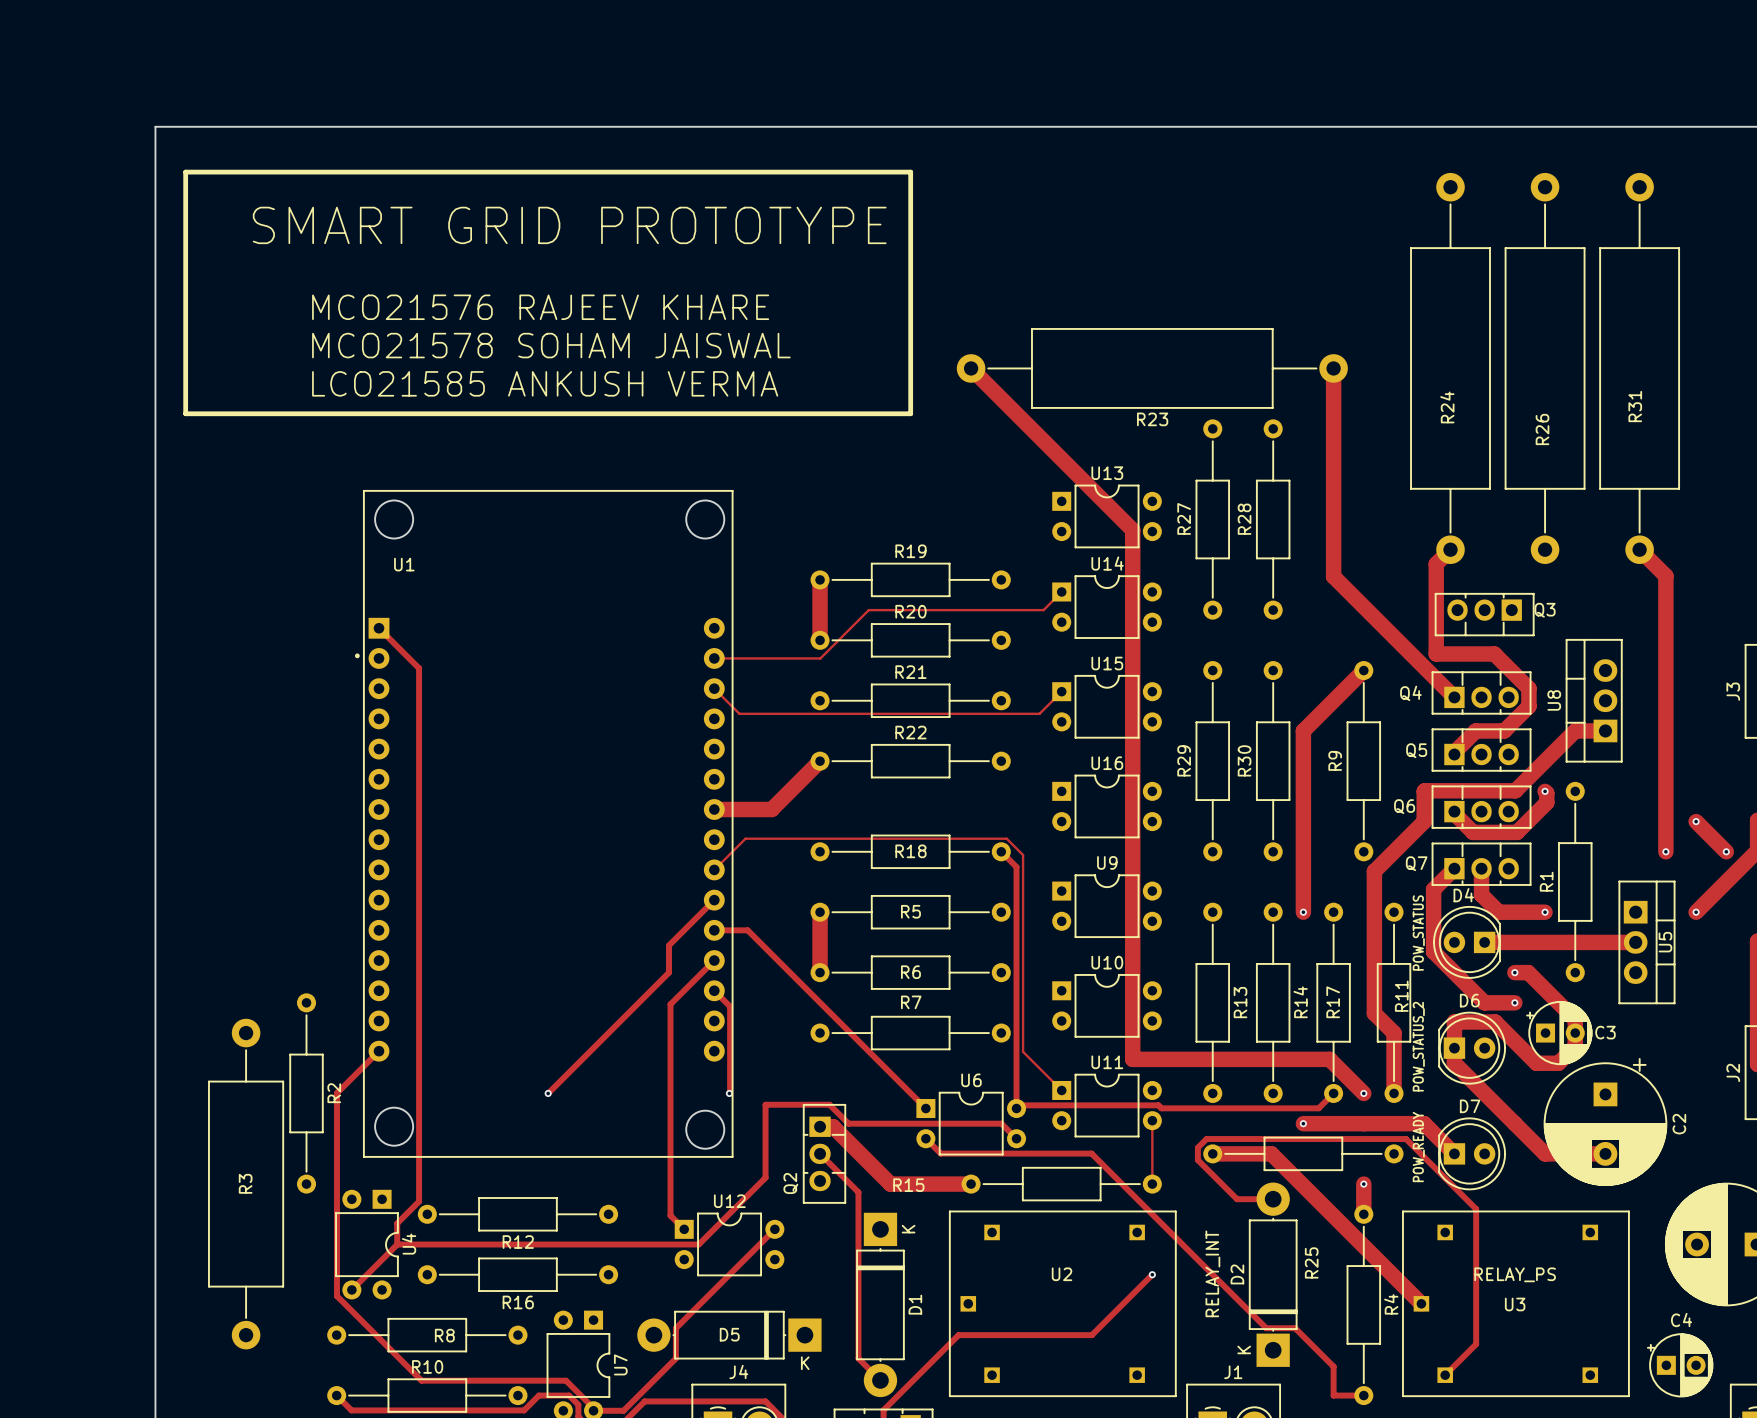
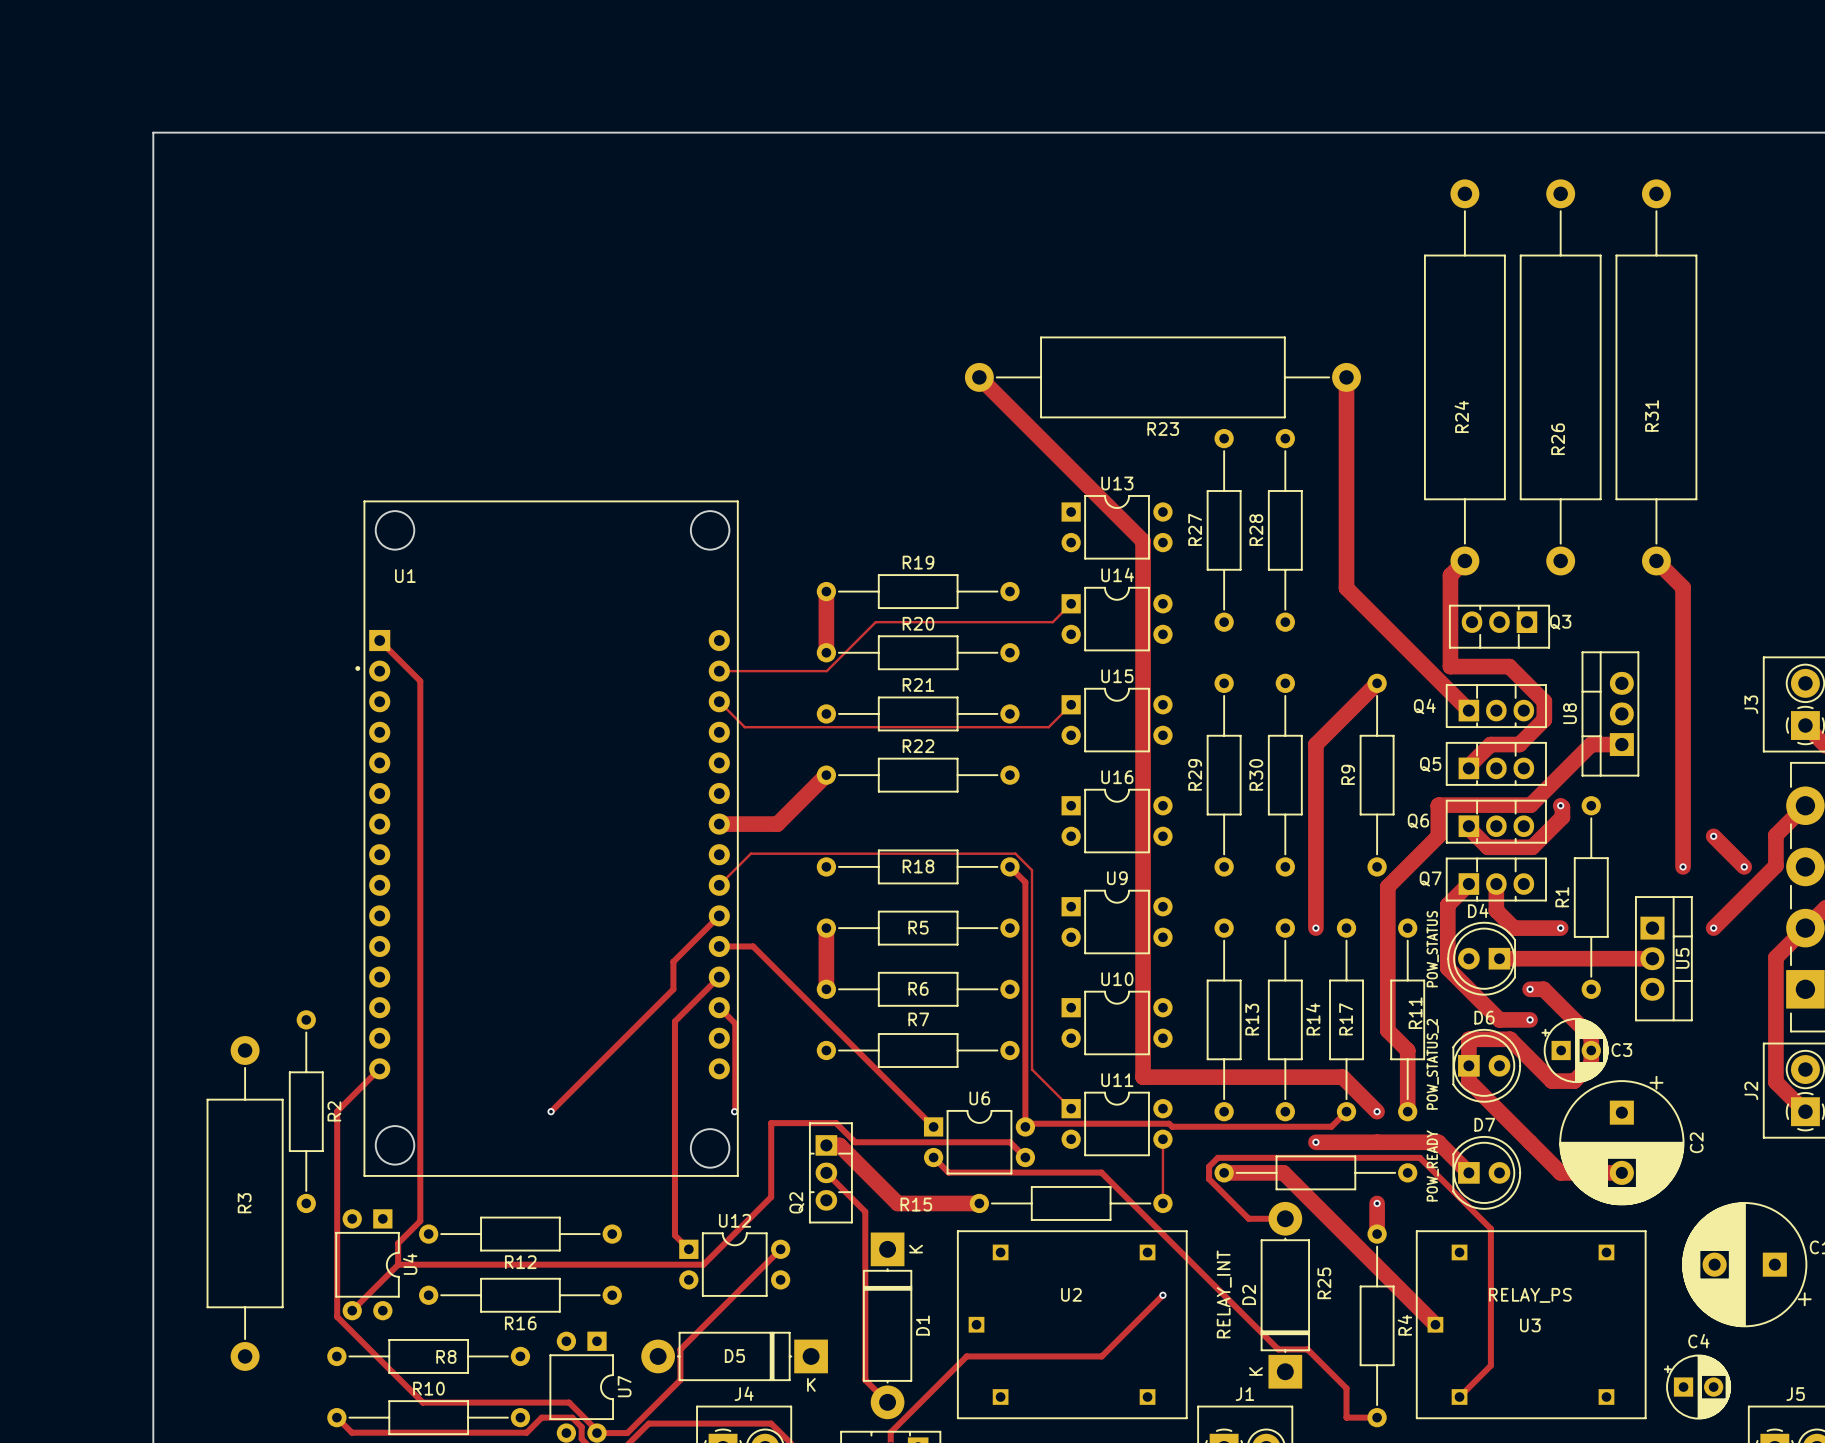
line: (185, 172) (910, 172) (910, 413) (185, 413) (185, 172) -> none
text: SMART GRID PROTOTYPE (569, 225) -> none
text: MCO21576 RAJEEV KHARE (540, 307) -> none
text: MCO21578 SOHAM JAISWAL (551, 345) -> none
text: LCO21585 ANKUSH VERMA (545, 383) -> none

